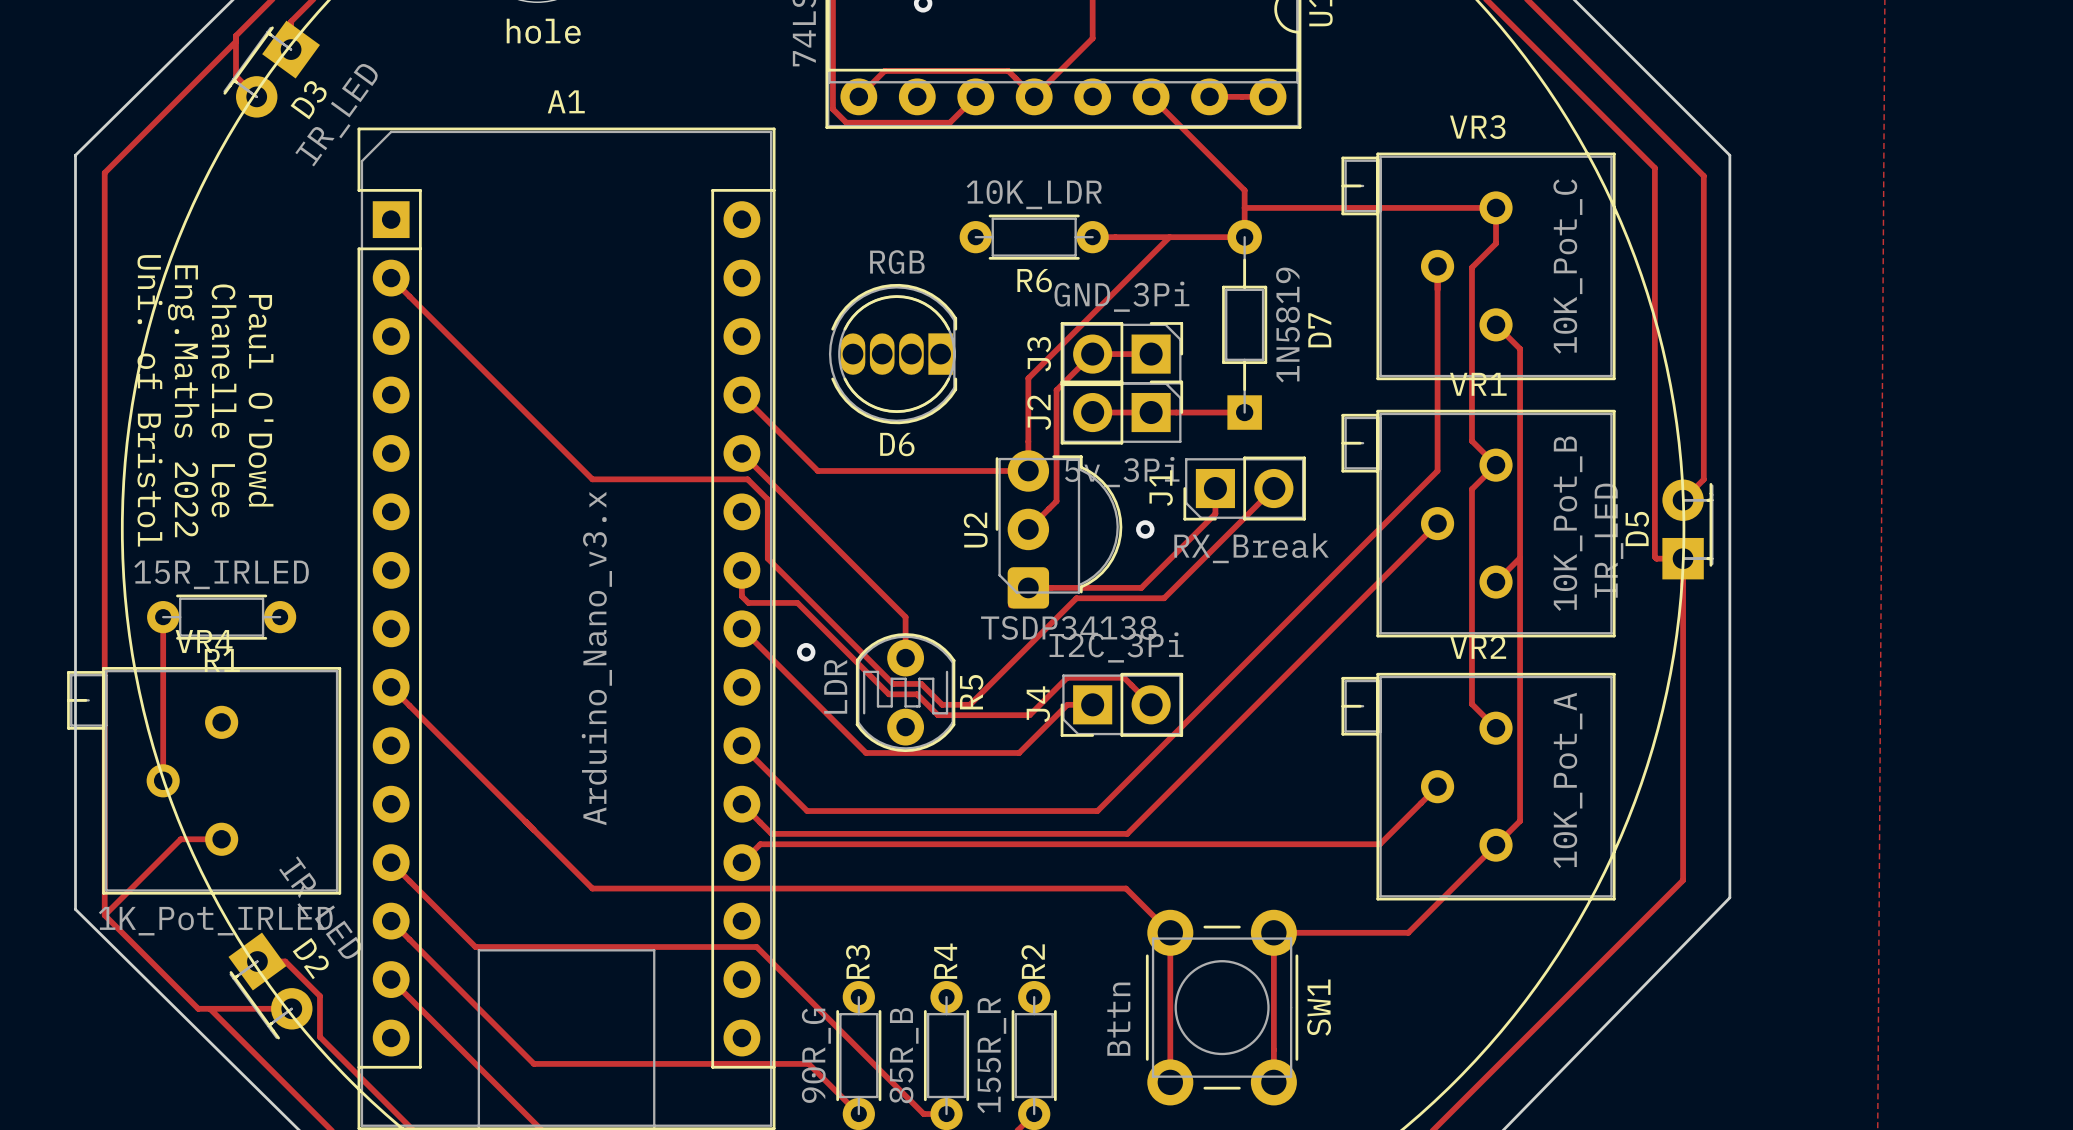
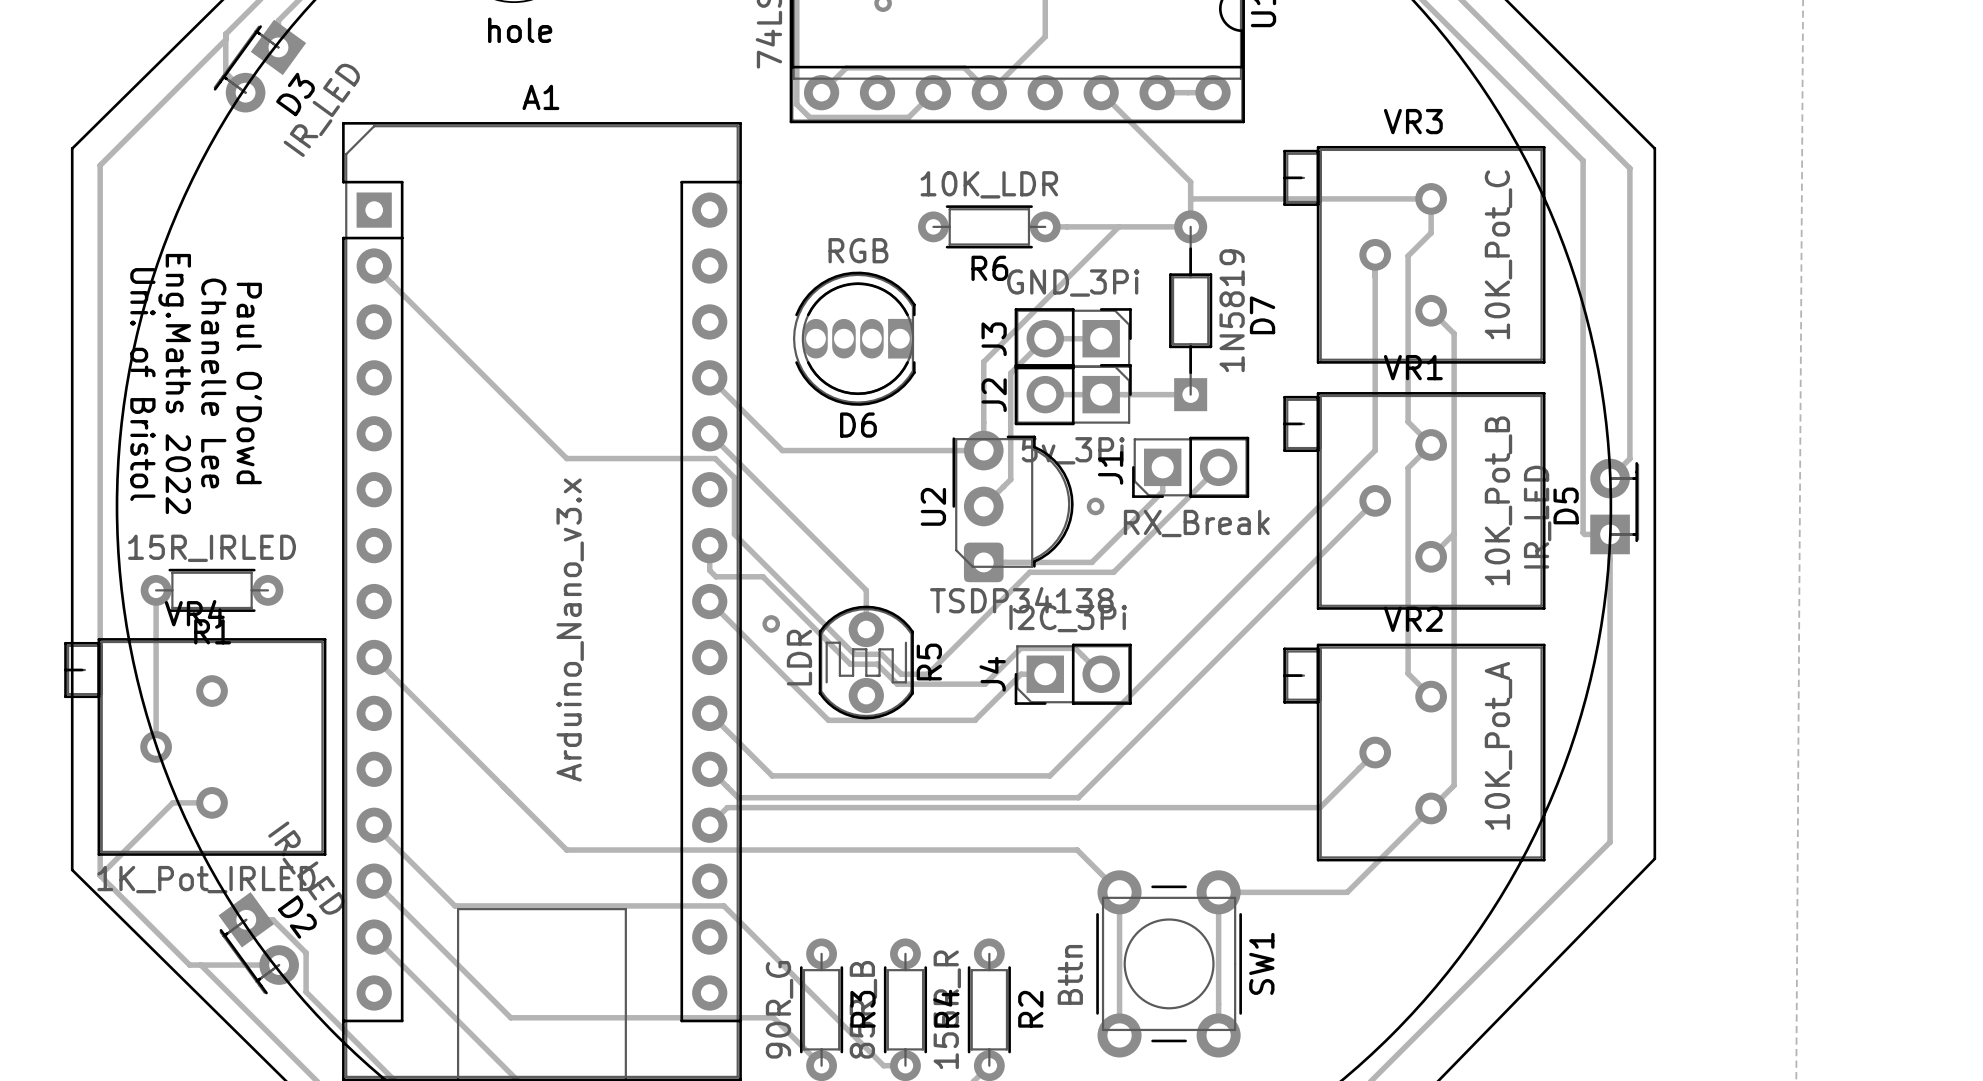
R3 name position: R3 (857, 961) -> R3 (863, 1009)
R4 name position: R4 (945, 961) -> R4 (946, 1008)
R2 name position: R2 (1033, 961) -> R2 (1030, 1009)

